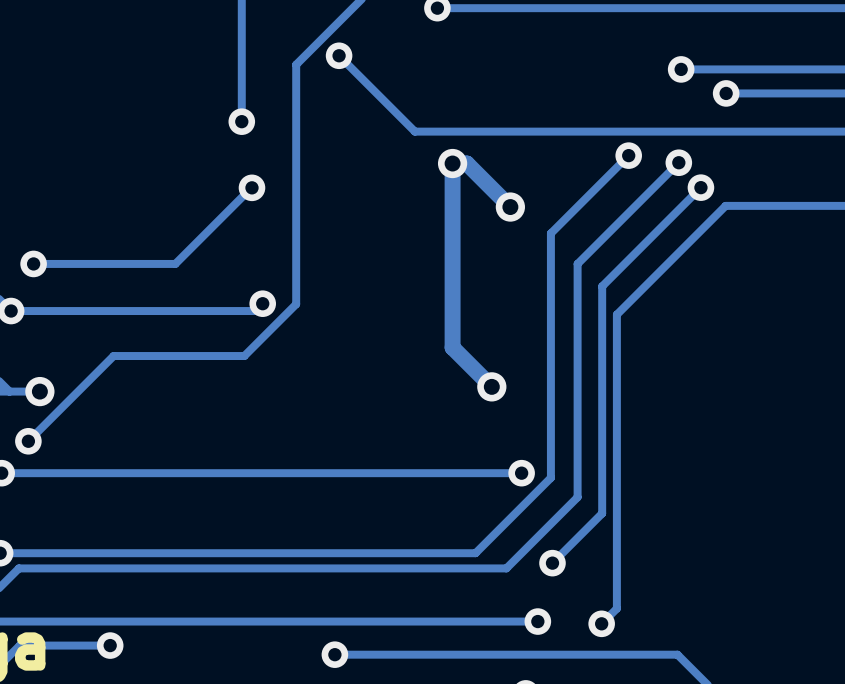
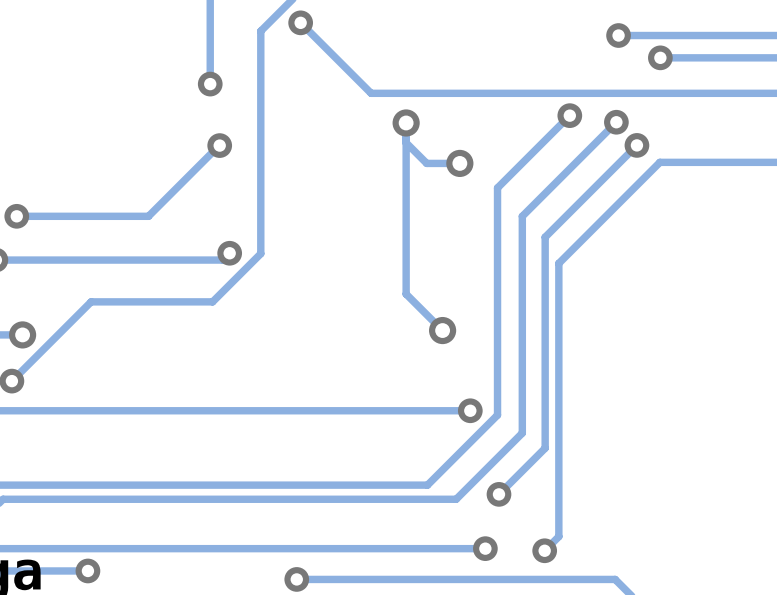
track: (452, 163) (466, 163) (510, 207) -> (406, 142) (426, 163) (459, 163)
track width: thick (452, 163) (452, 347) (491, 386) -> thin (406, 122) (406, 294) (442, 330)

